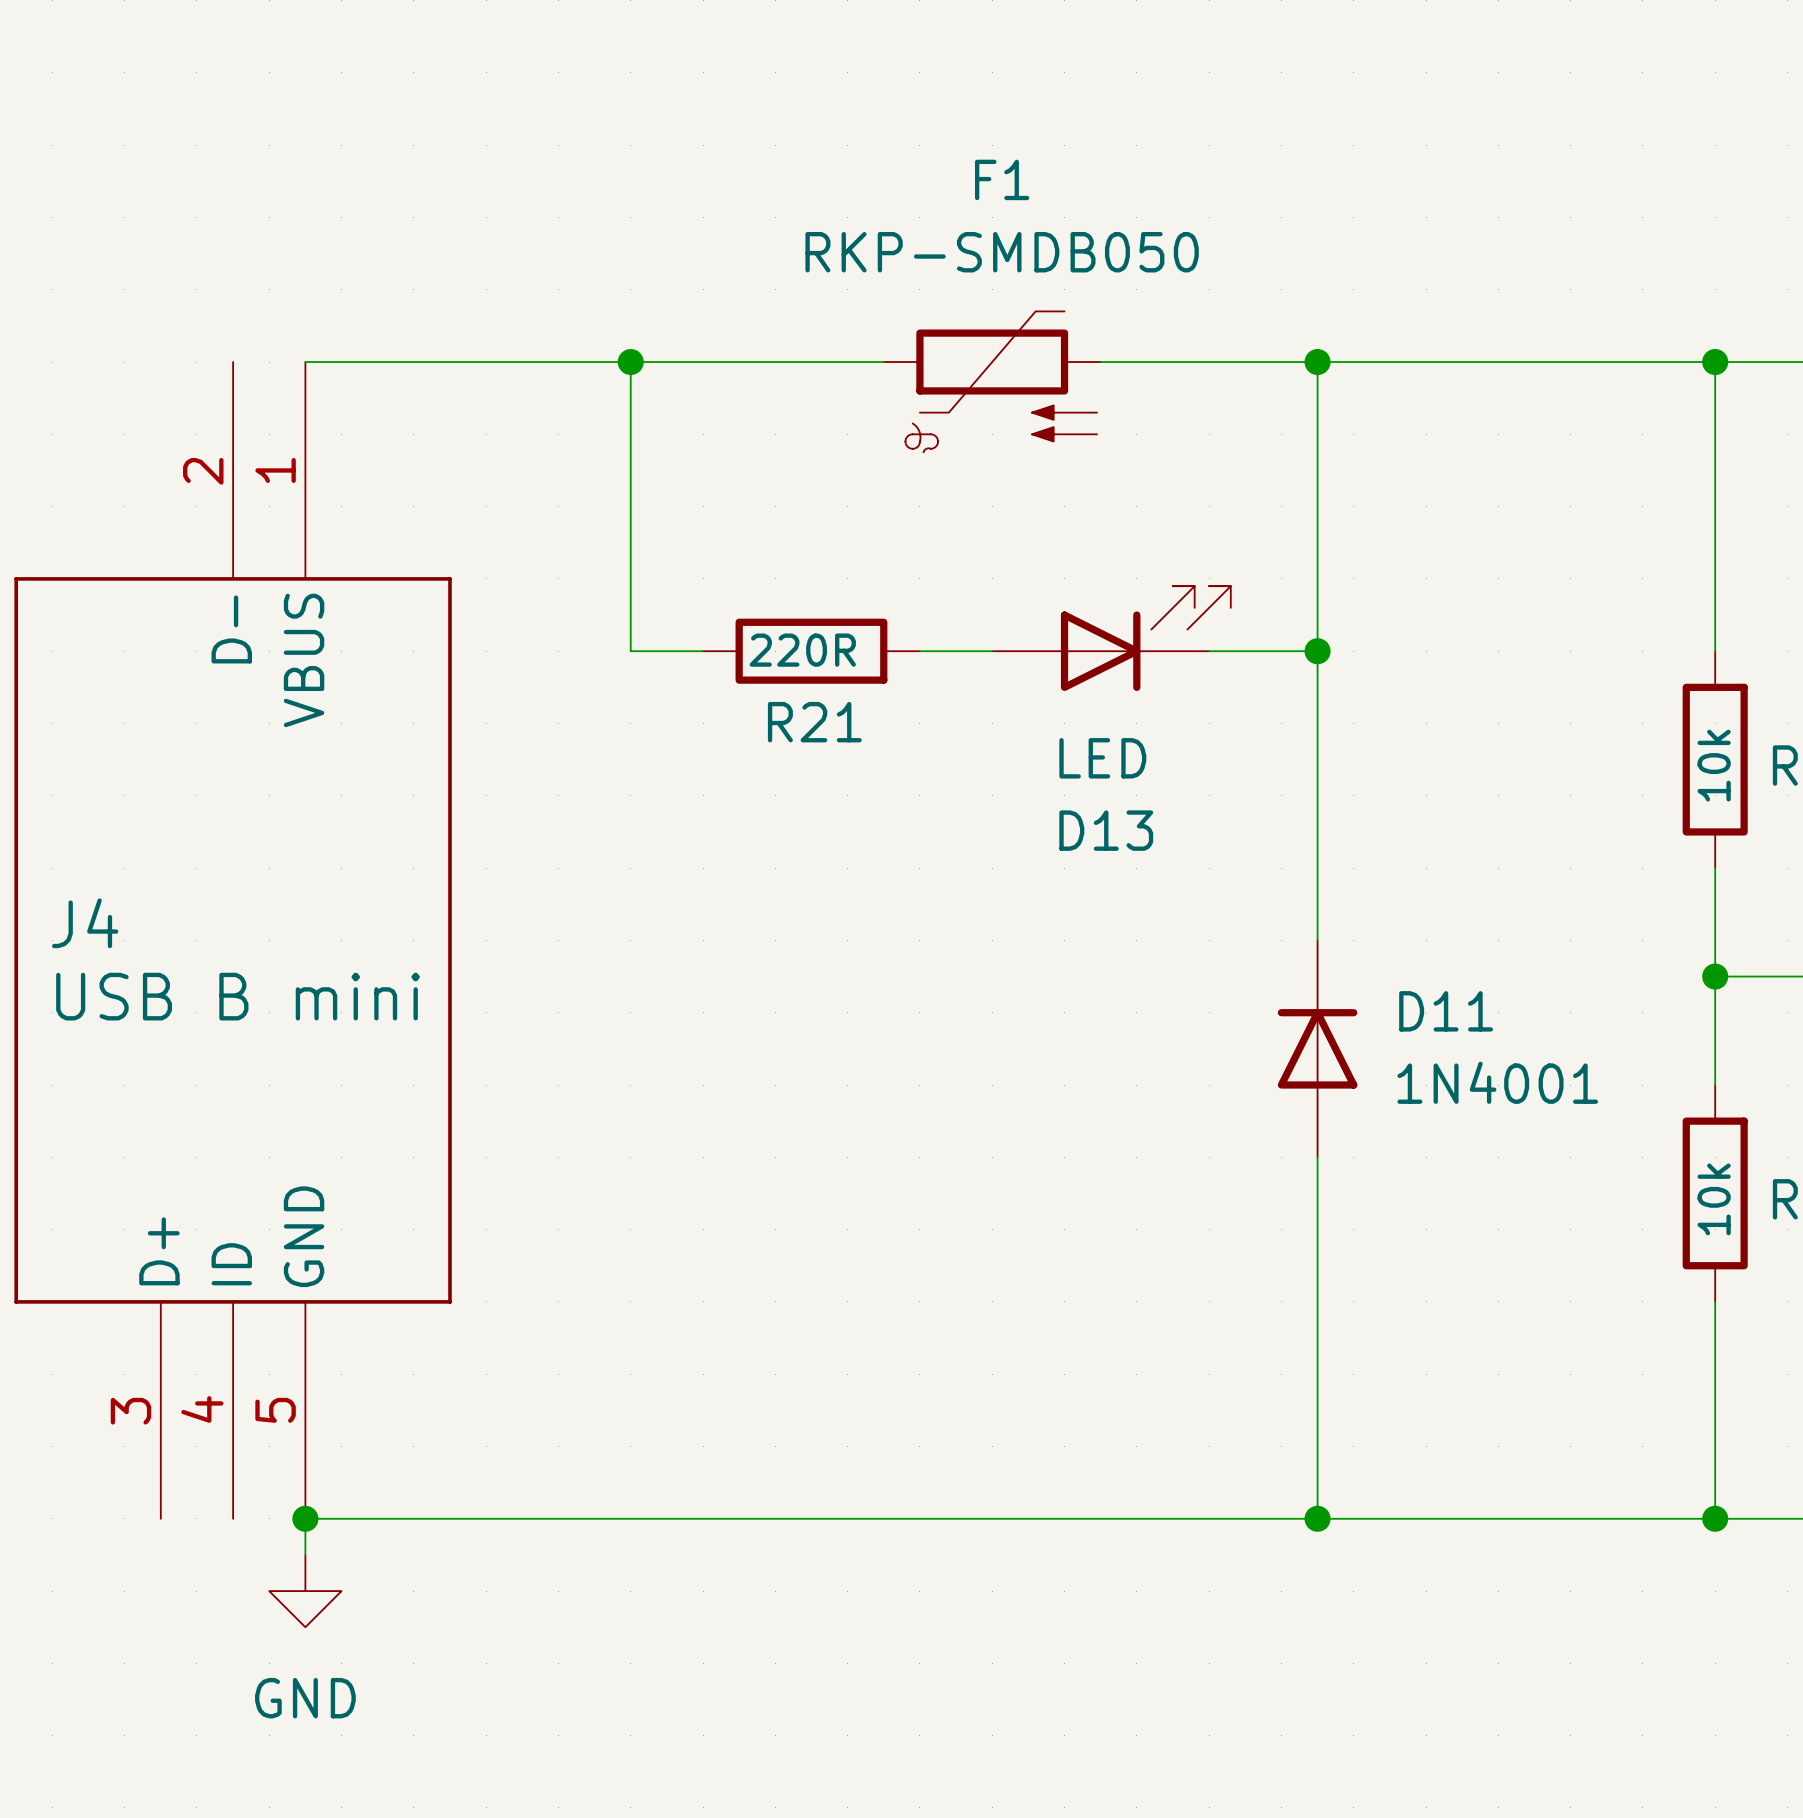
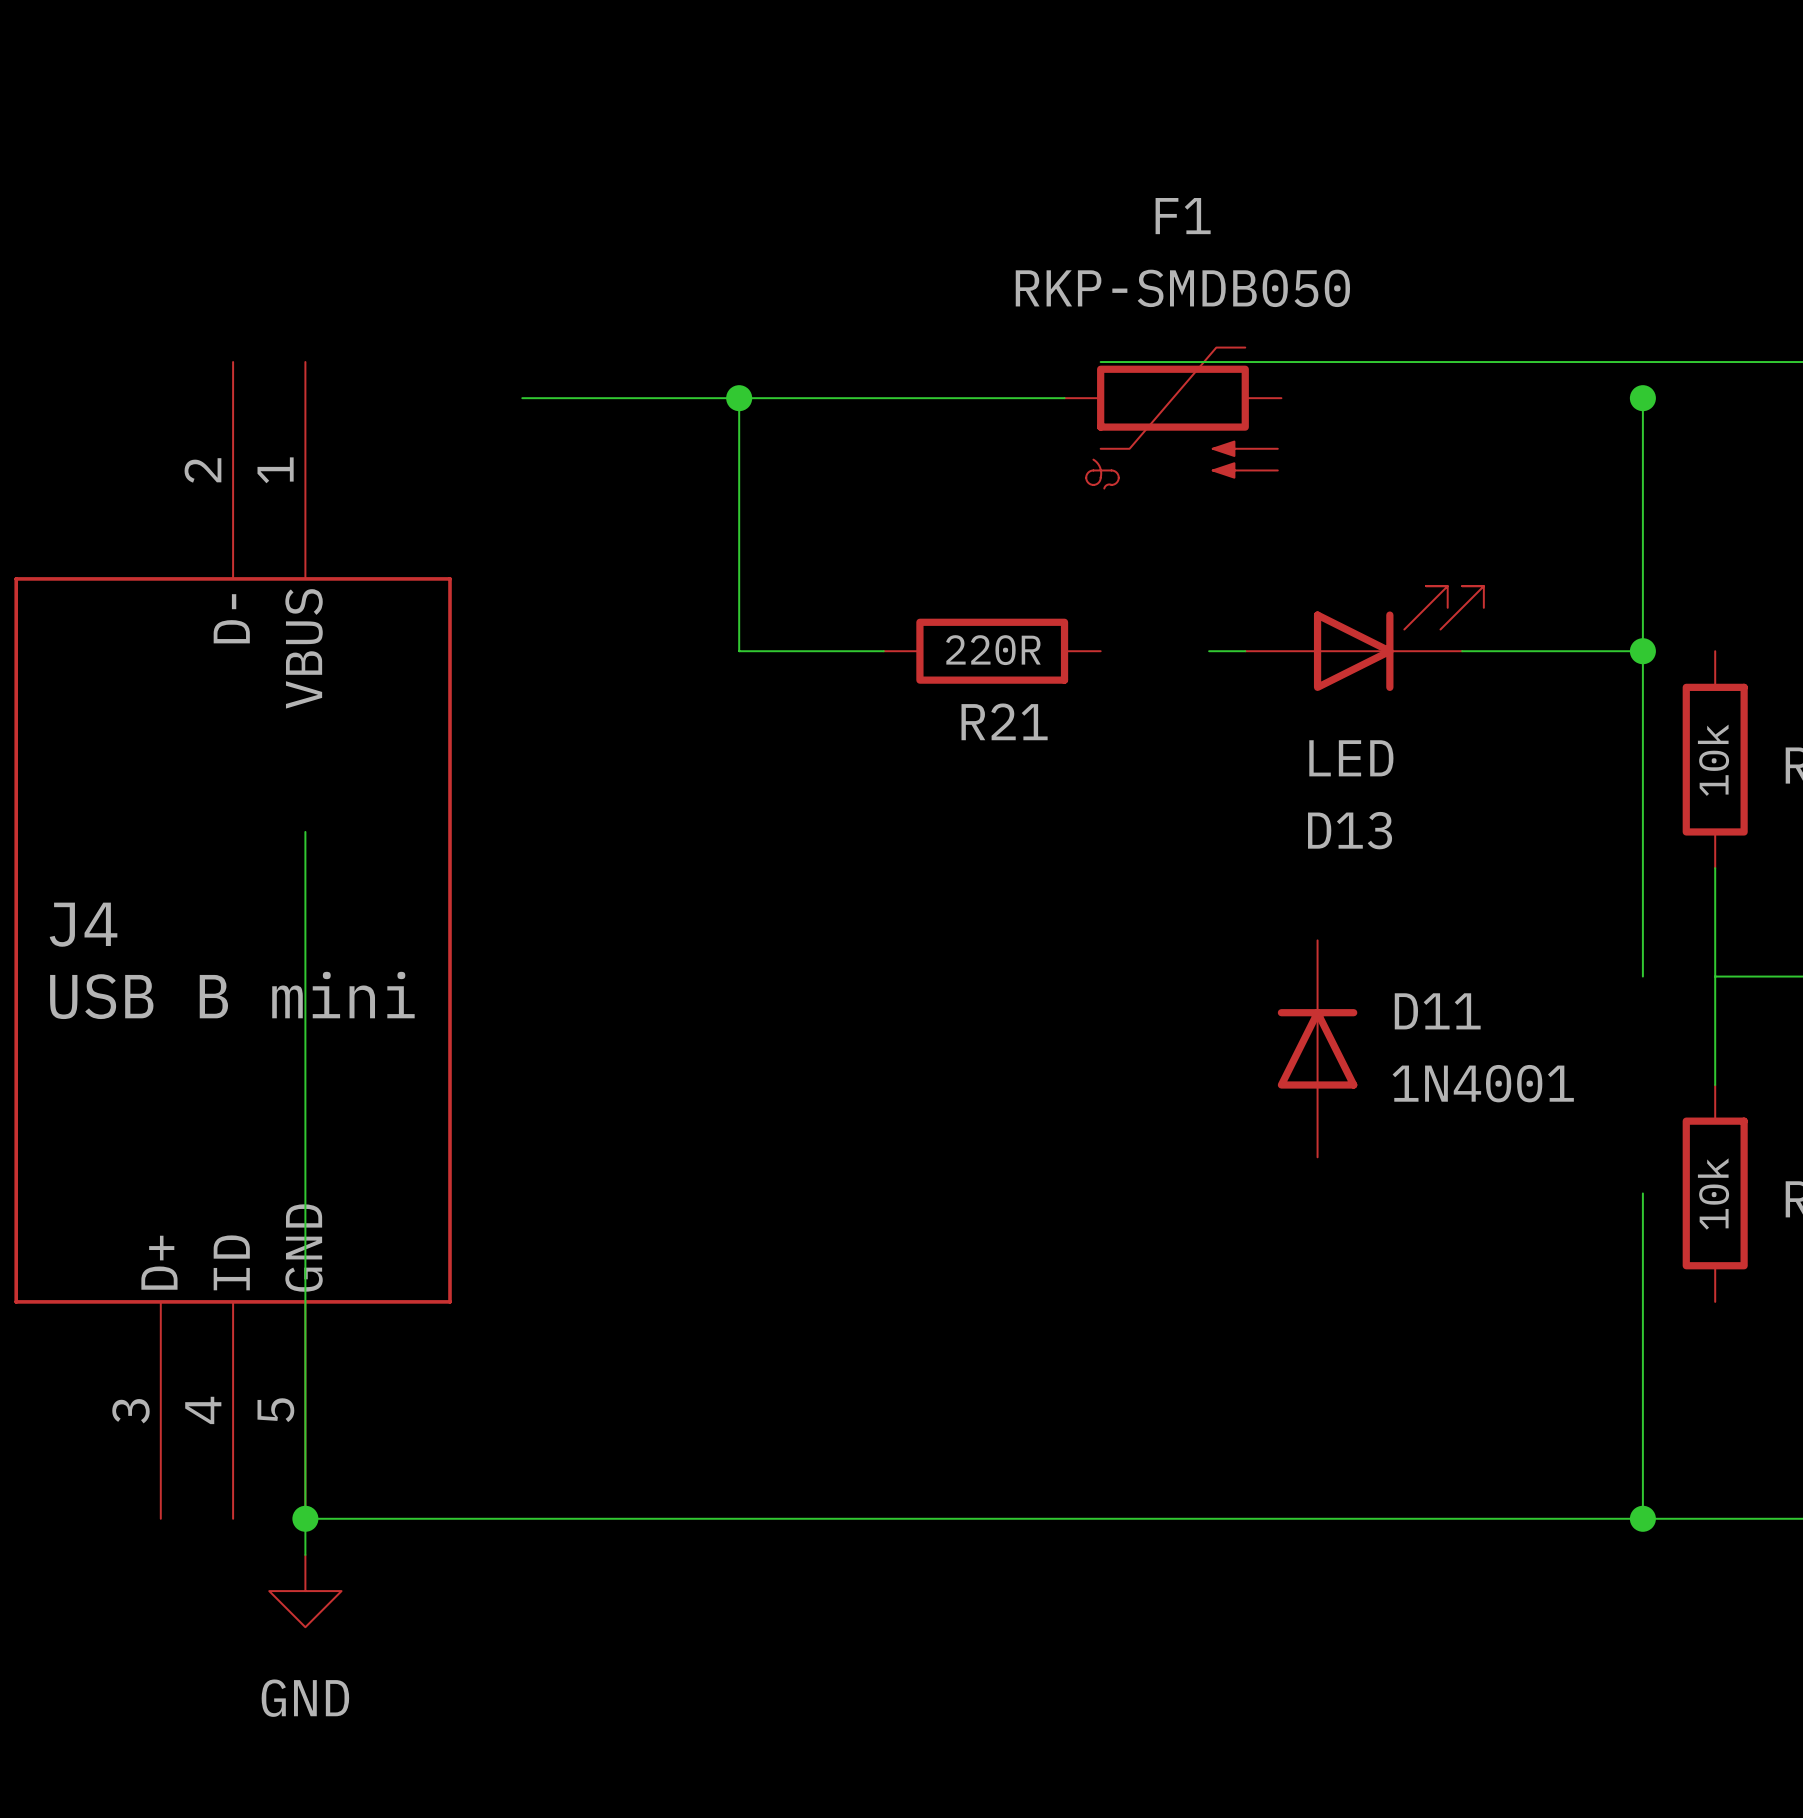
wire: (305, 362) (883, 362) -> none
wire: (630, 362) (630, 651) (703, 651) -> none
junction position: (630, 362) -> (739, 398)
wire: (1317, 362) (1317, 940) -> (1642, 398) (1642, 976)
junction: (1317, 362) -> none
wire: (1715, 362) (1715, 651) -> none
junction position: (1715, 362) -> (1642, 398)
F1 position: (992, 381) -> (1172, 418)
wire: none -> (522, 398) (1064, 398)
wire: none -> (739, 398) (739, 651) (883, 651)
D13 position: (1111, 638) -> (1364, 638)
R21 position: (811, 651) -> (992, 651)
wire: (919, 651) (992, 651) -> none
junction: (1317, 651) -> none
wire: none -> (1462, 651) (1642, 651)
junction: none -> (1642, 651)
wire: none -> (305, 831) (305, 1518)
junction: (1715, 976) -> none
wire: (1317, 1157) (1317, 1518) -> none
wire: none -> (1642, 1193) (1642, 1518)
wire: (1715, 1301) (1715, 1518) -> none
junction: (1317, 1518) -> none
junction position: (1715, 1518) -> (1642, 1518)

